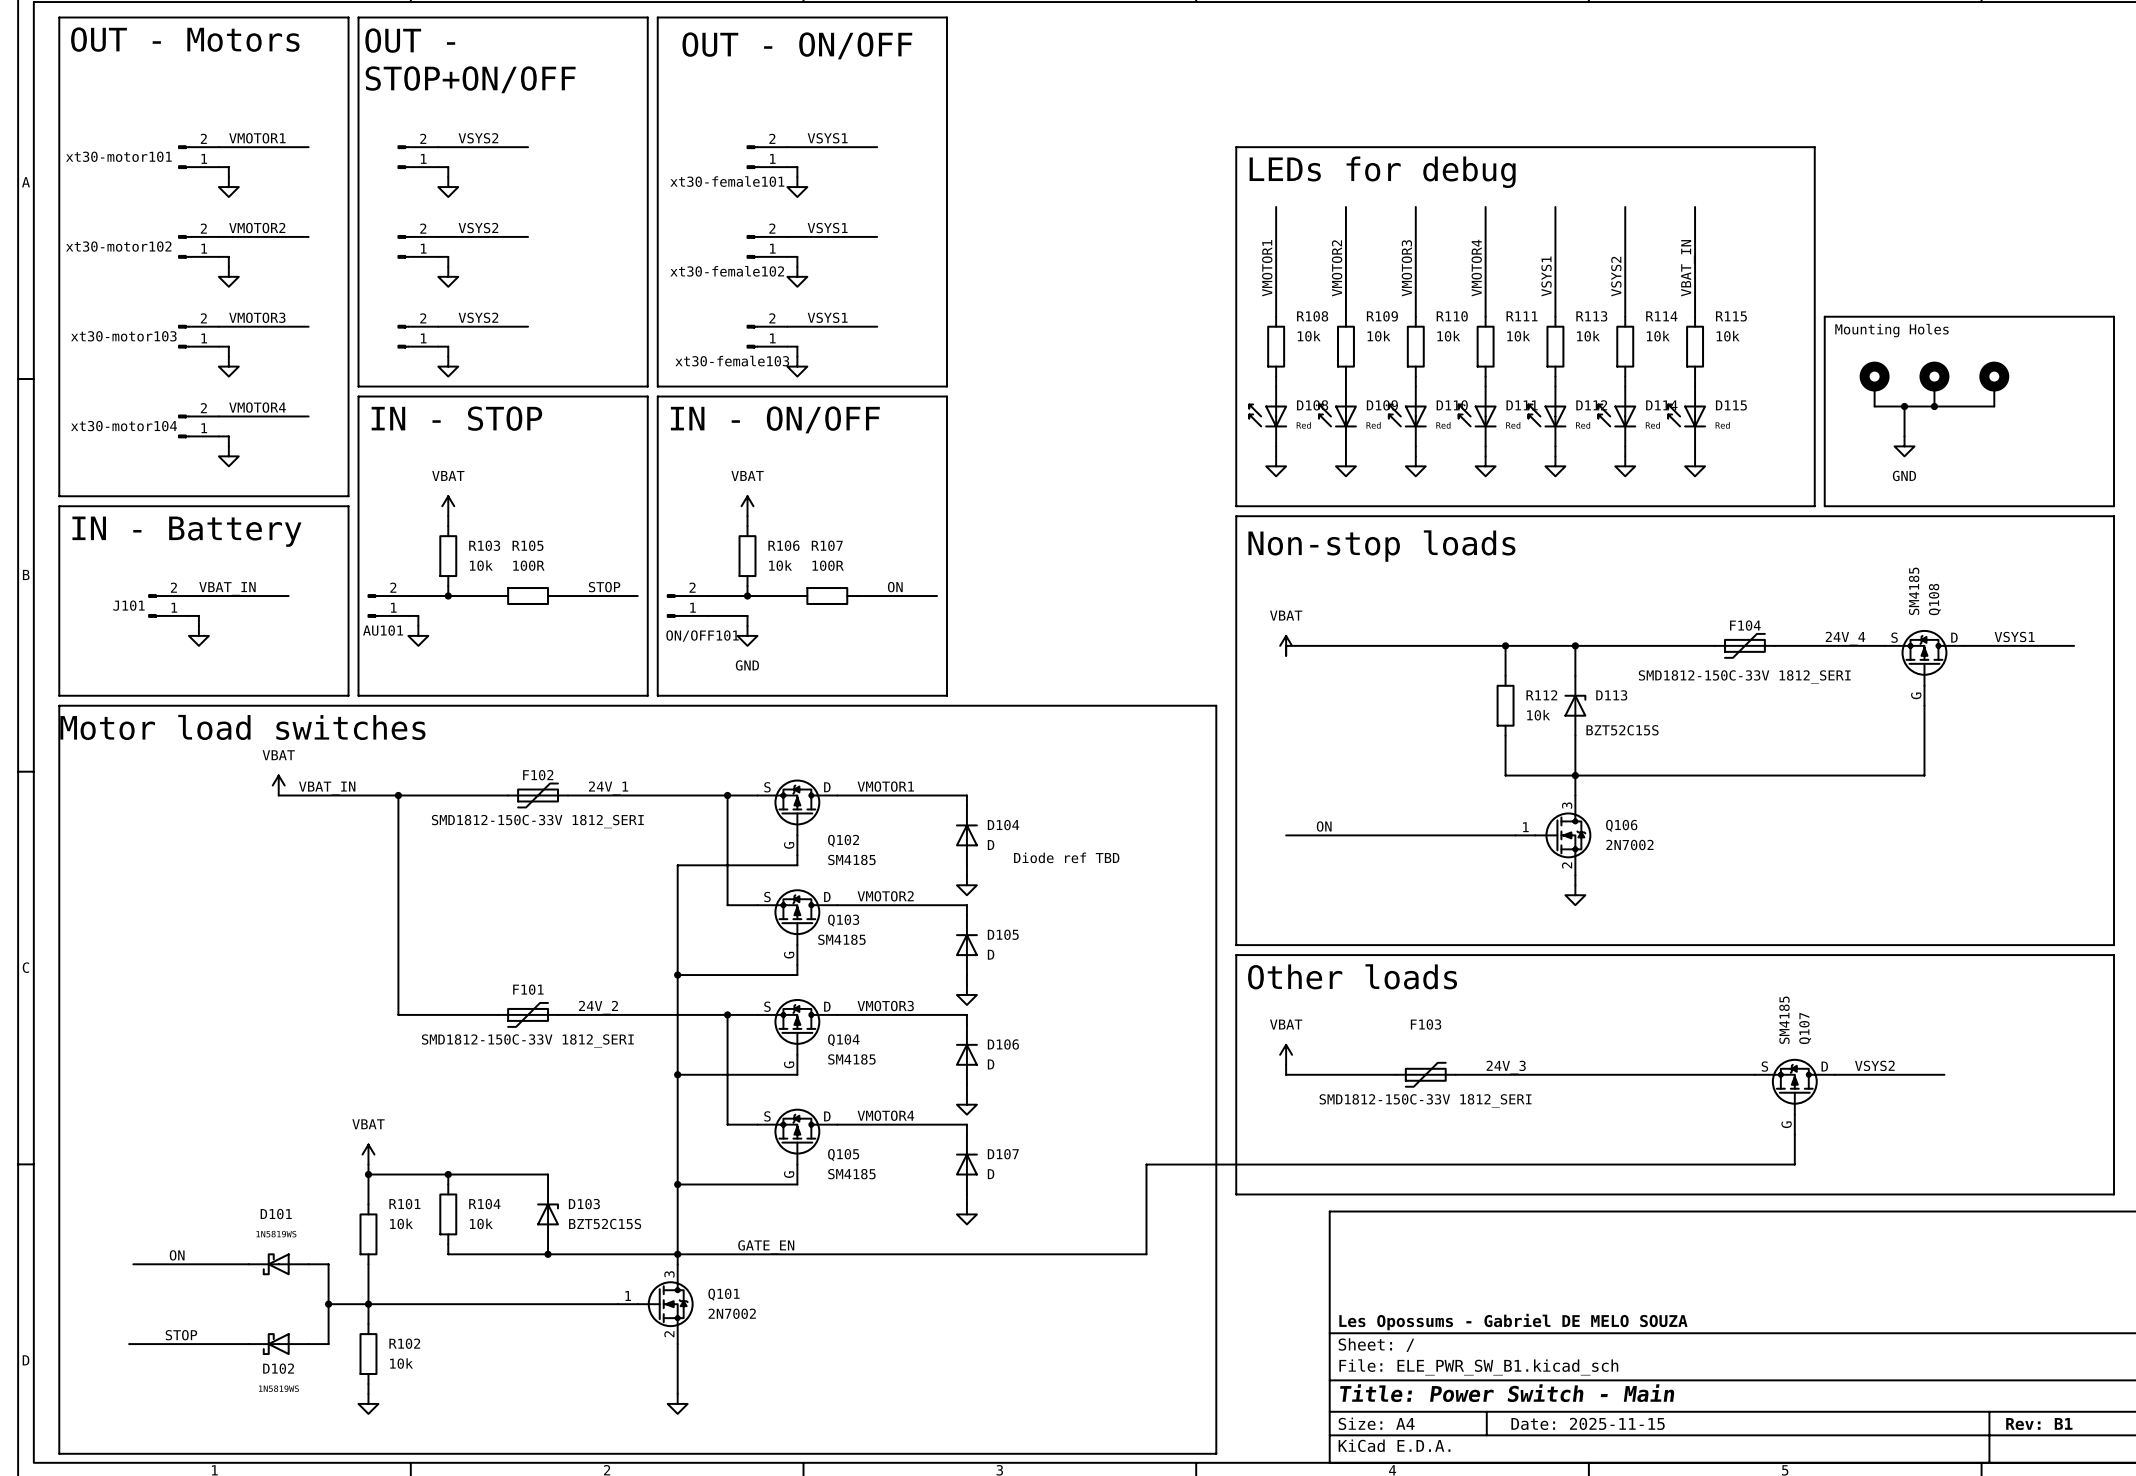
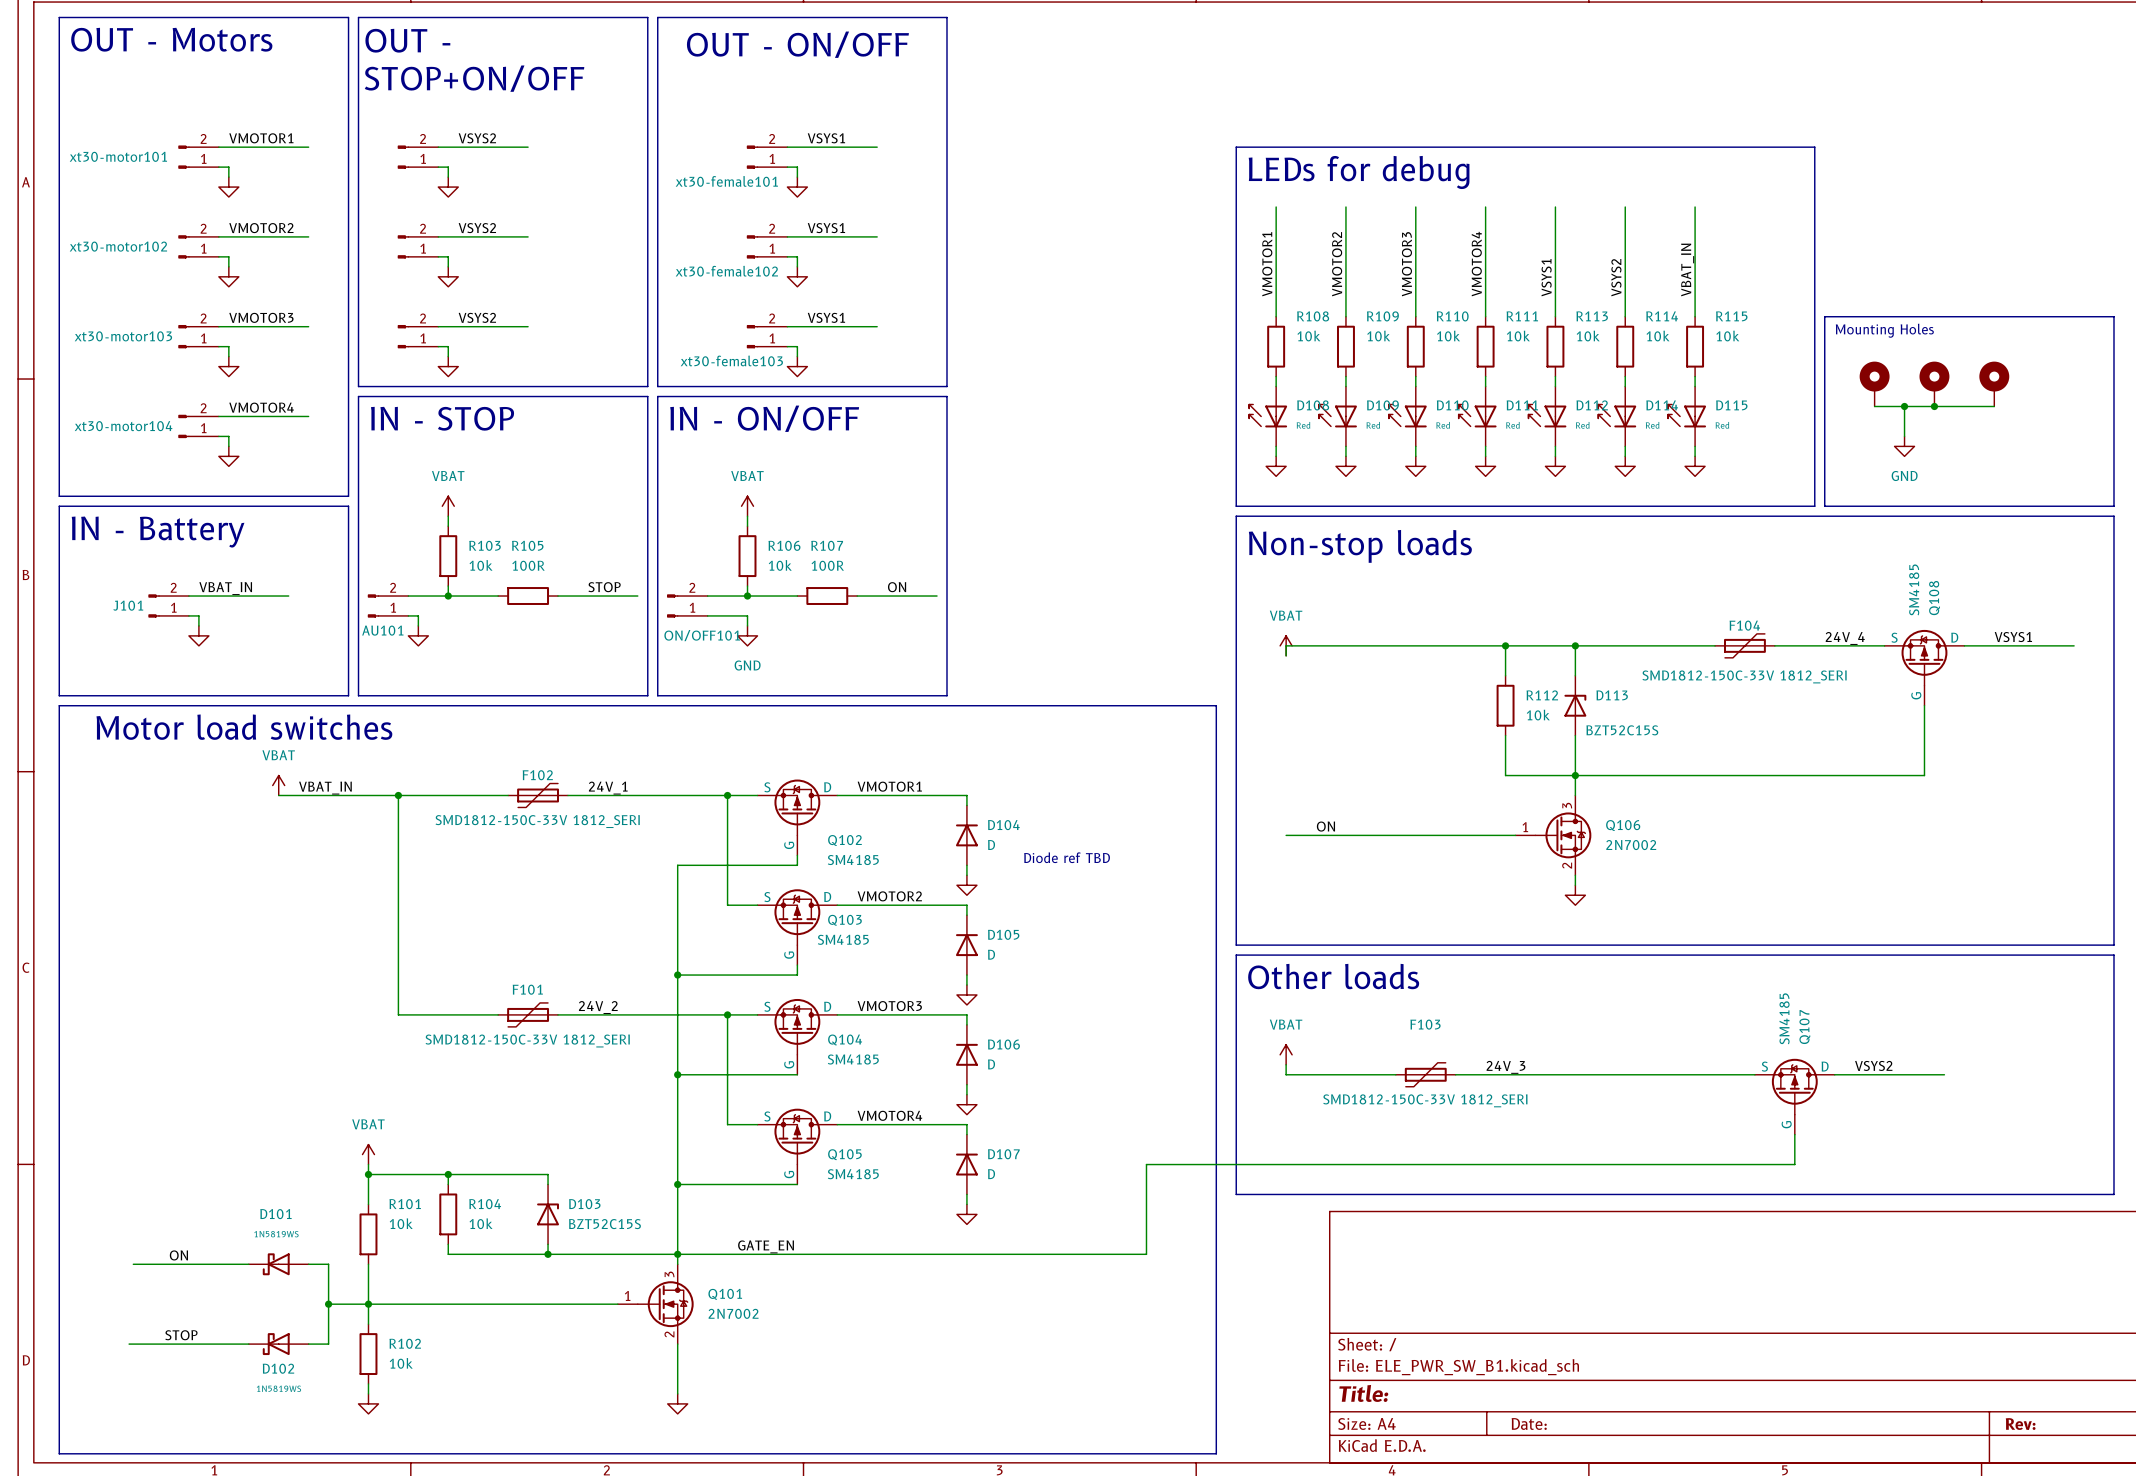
title block: Les Opossums - Gabriel DE MELO SOUZA (1513, 1322) -> none
title block: Title: Power Switch - Main (1507, 1393) -> Title: (1363, 1393)
title block: Date: 2025-11-15 (1588, 1423) -> Date: (1529, 1424)
title block: Rev: B1 (2039, 1424) -> Rev: (2020, 1424)

